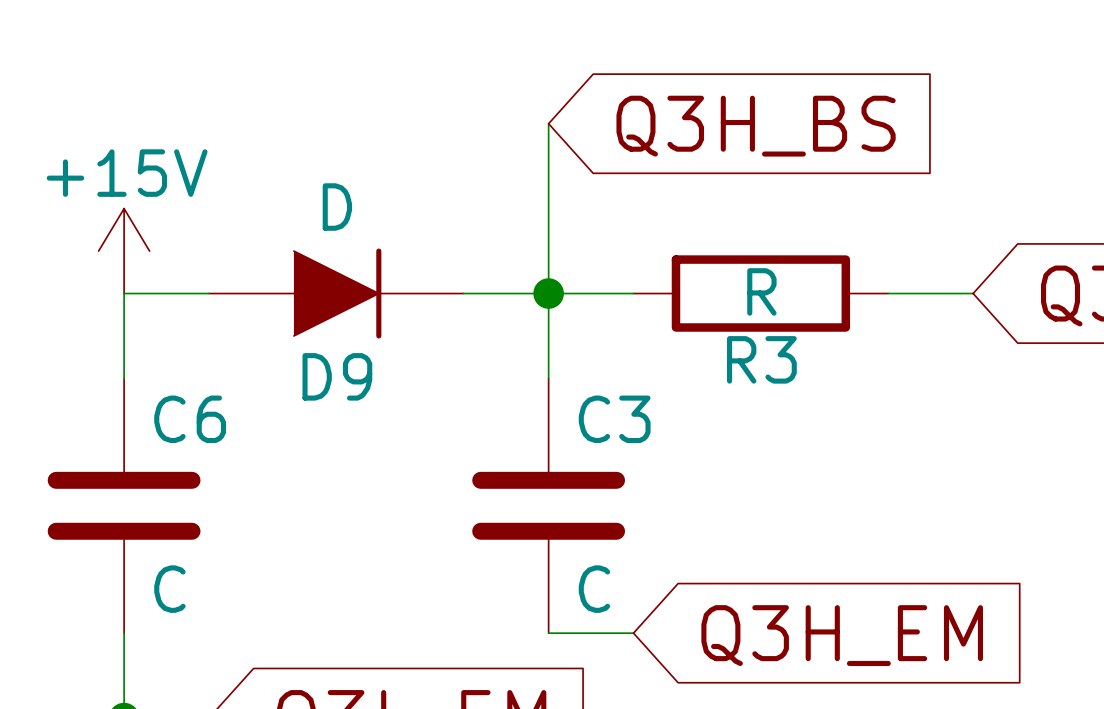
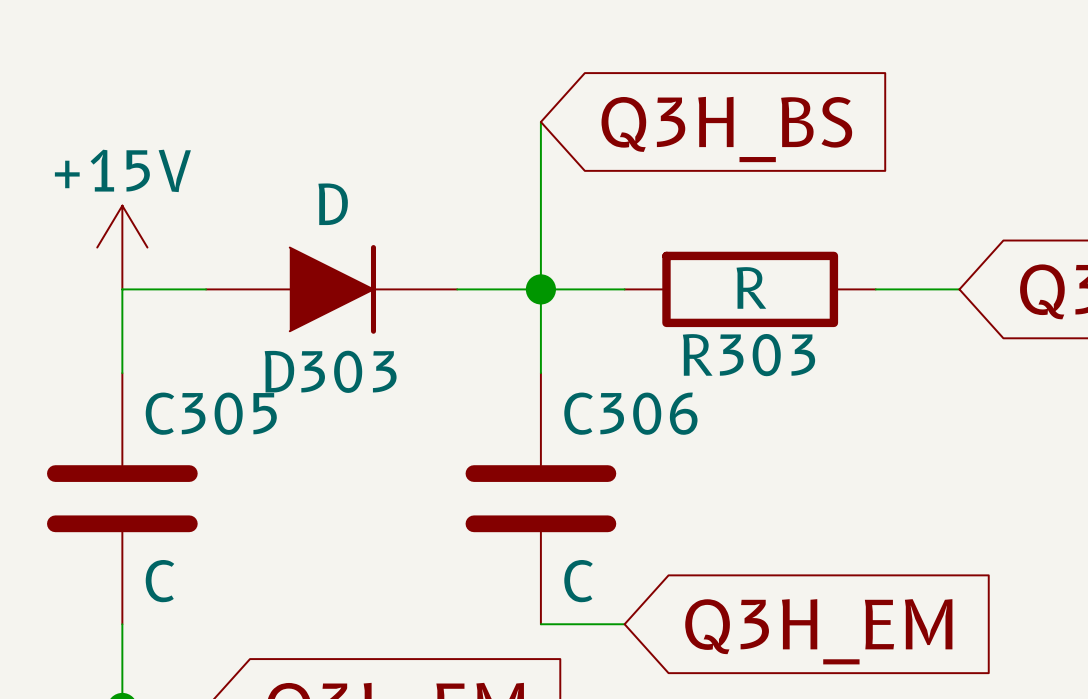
R3 name: R3 (761, 359) -> R303 (748, 355)
D9 name: D9 (337, 376) -> D303 (330, 371)
C6 name: C6 (190, 419) -> C305 (211, 413)
C3 name: C3 (614, 419) -> C306 (630, 413)

